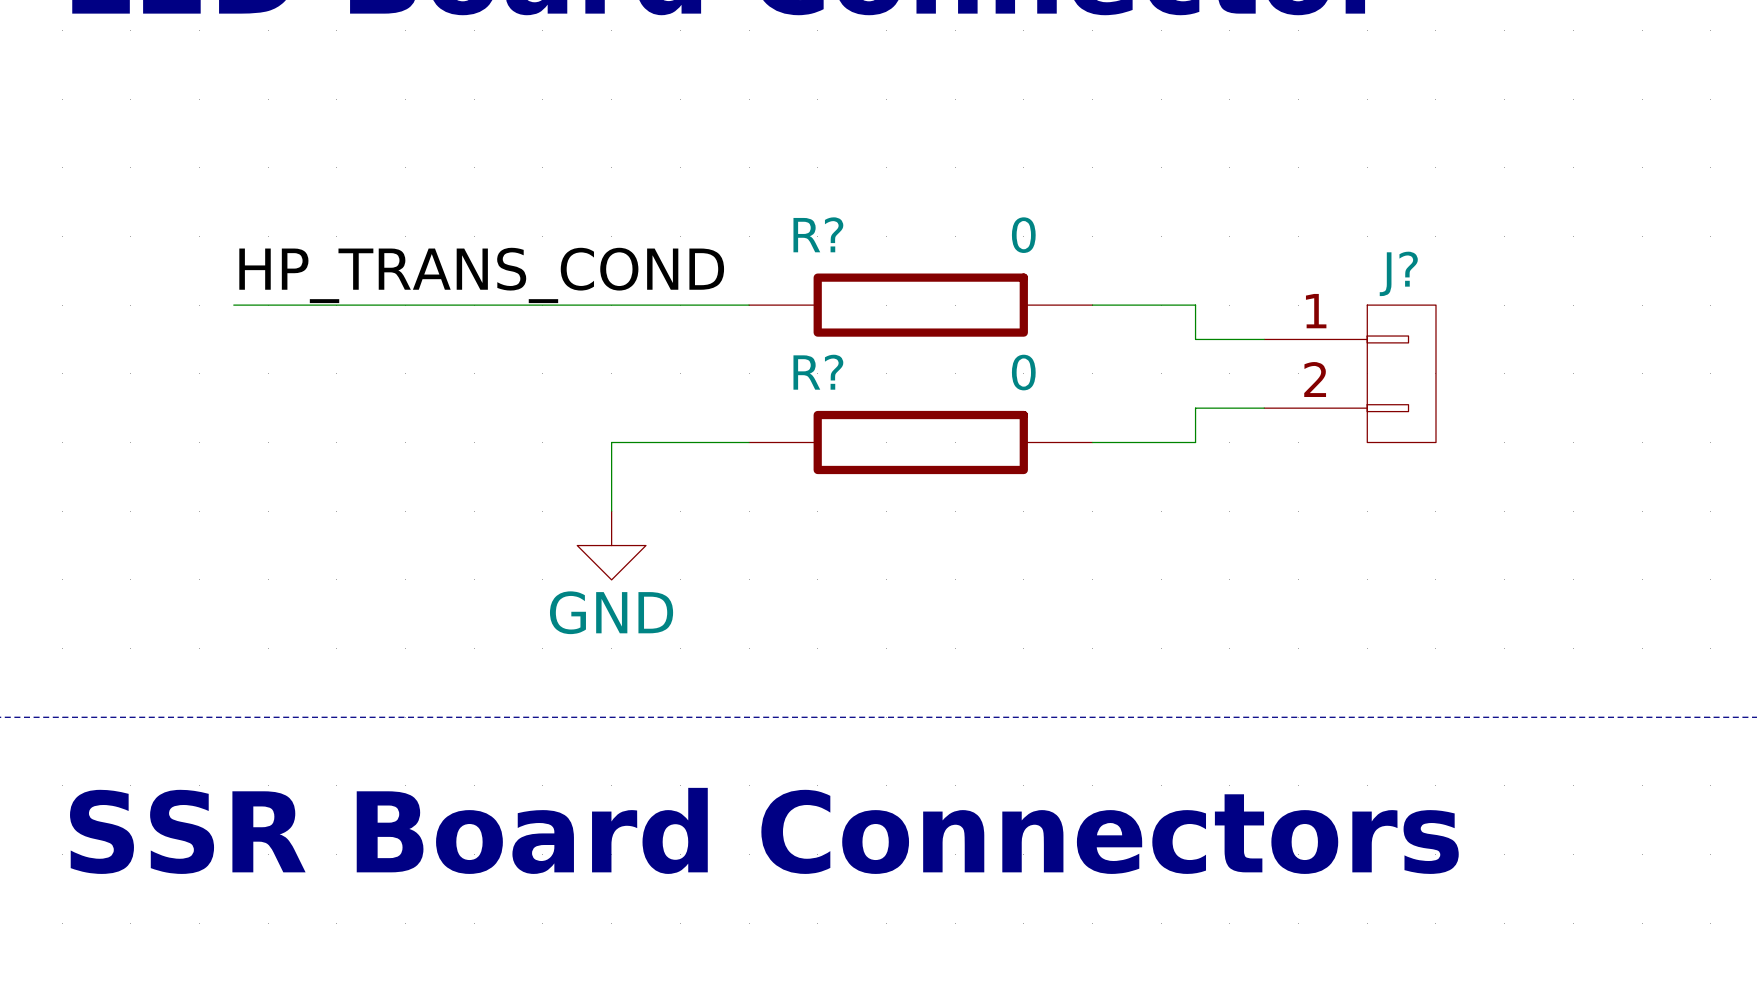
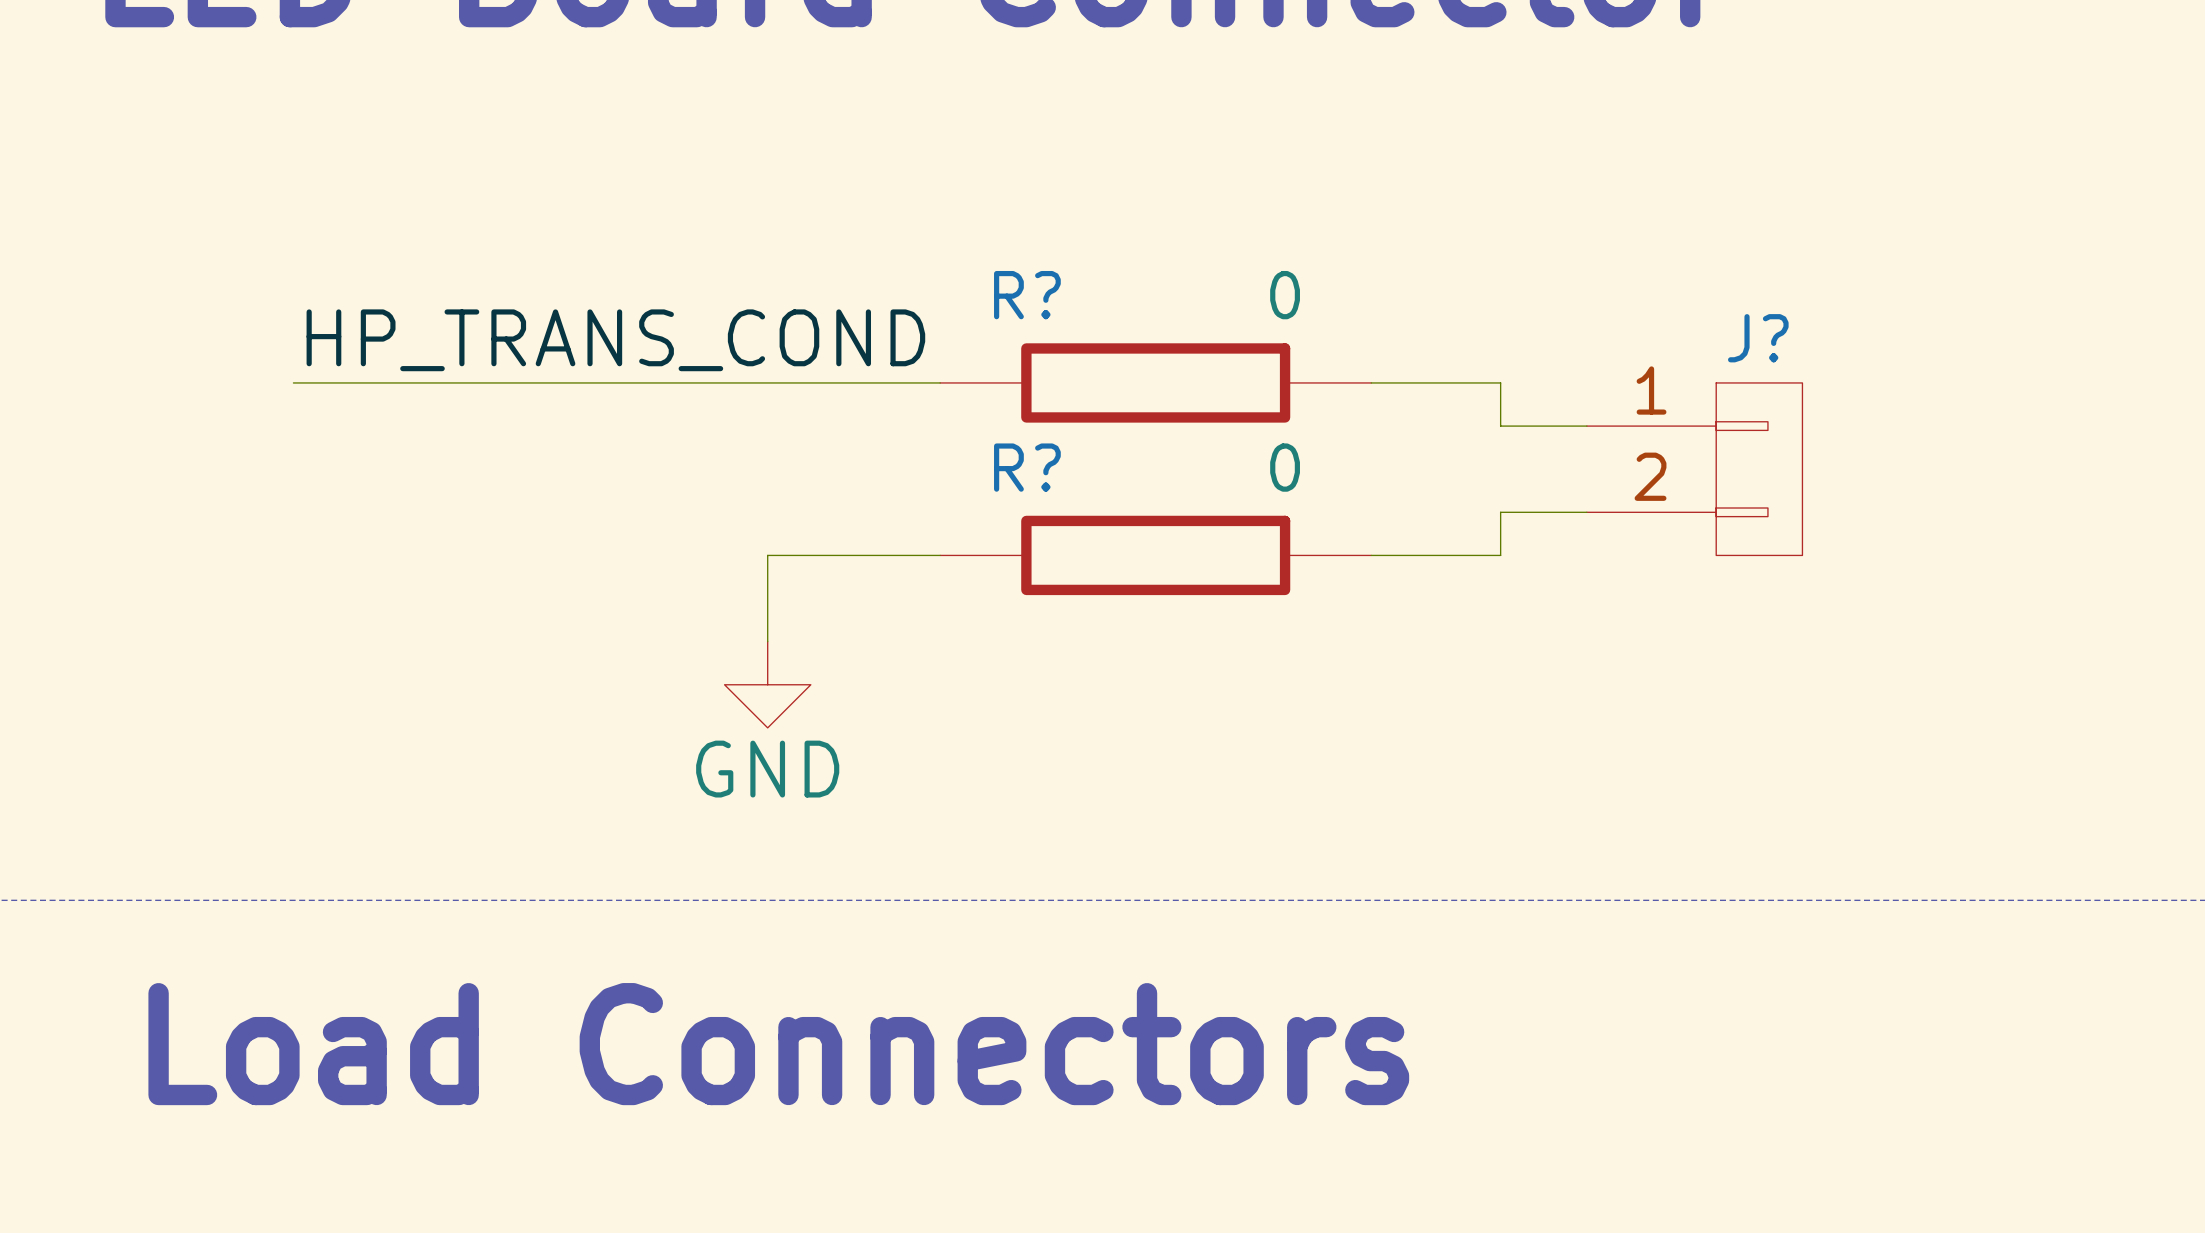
text: SSR Board Connectors (764, 830) -> Load Connectors (778, 1044)

